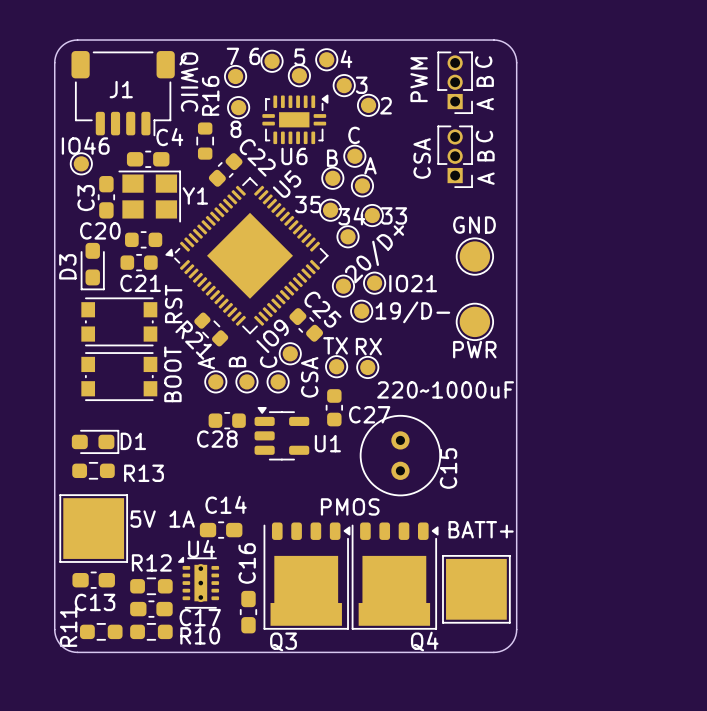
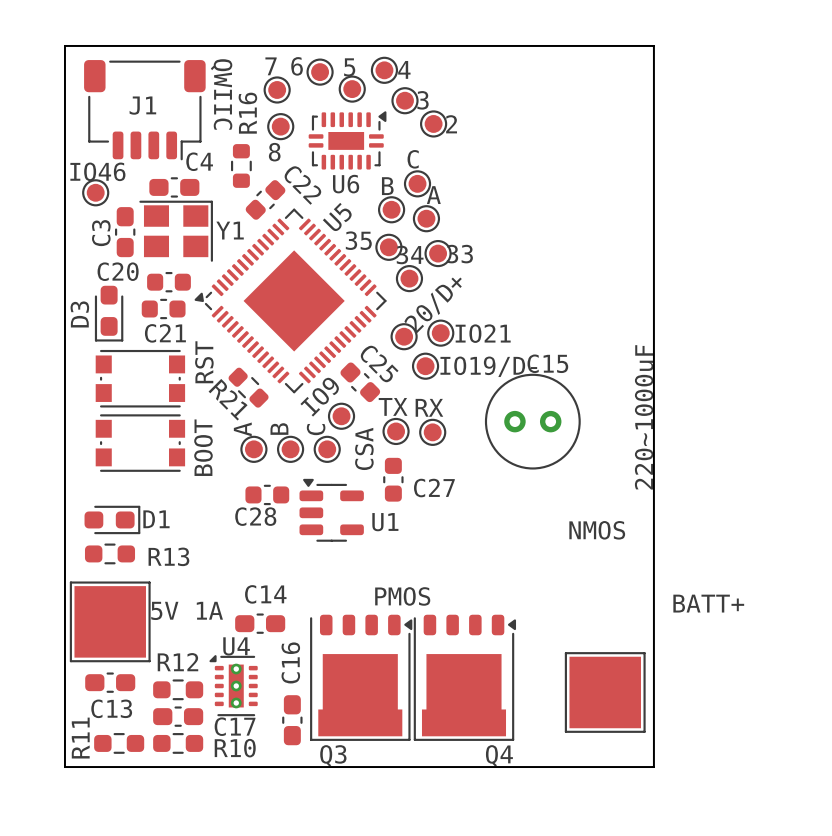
board edge: (77, 40) (493, 40) (505, 43) (511, 48) (516, 62) (516, 629) (513, 640) (507, 647) (493, 652) (77, 652) (68, 650) (59, 643) (54, 629) (54, 62) (56, 54) (61, 46) (68, 41) (77, 40) -> (64, 45) (64, 767) (653, 767) (653, 45) (64, 45)
text: C (483, 62) -> none
text: PWM (419, 79) -> none
text: B (485, 81) -> none
part: (455, 82) -> none
text: A (485, 104) -> none
text: C (484, 136) -> none
text: B (485, 155) -> none
part: (455, 156) -> none
text: CSA (422, 158) -> none
text: A (485, 178) -> none
text: GND (474, 225) -> none
part: (474, 256) -> none
text: 19/D- (412, 312) -> IO19/D- (488, 366)
part: (474, 321) -> none
text: PWR (474, 349) -> none
text rotation: 0° (445, 389) -> 90° counterclockwise (644, 417)
text: none -> NMOS (597, 530)
C15 rotation: 0° (400, 455) -> 90° clockwise (532, 421)
C15 position: (400, 455) -> (532, 421)
C15 name position: C15 (448, 468) -> C15 (547, 363)
text position: BATT+ (481, 529) -> BATT+ (708, 603)
part position: (476, 589) -> (605, 692)

